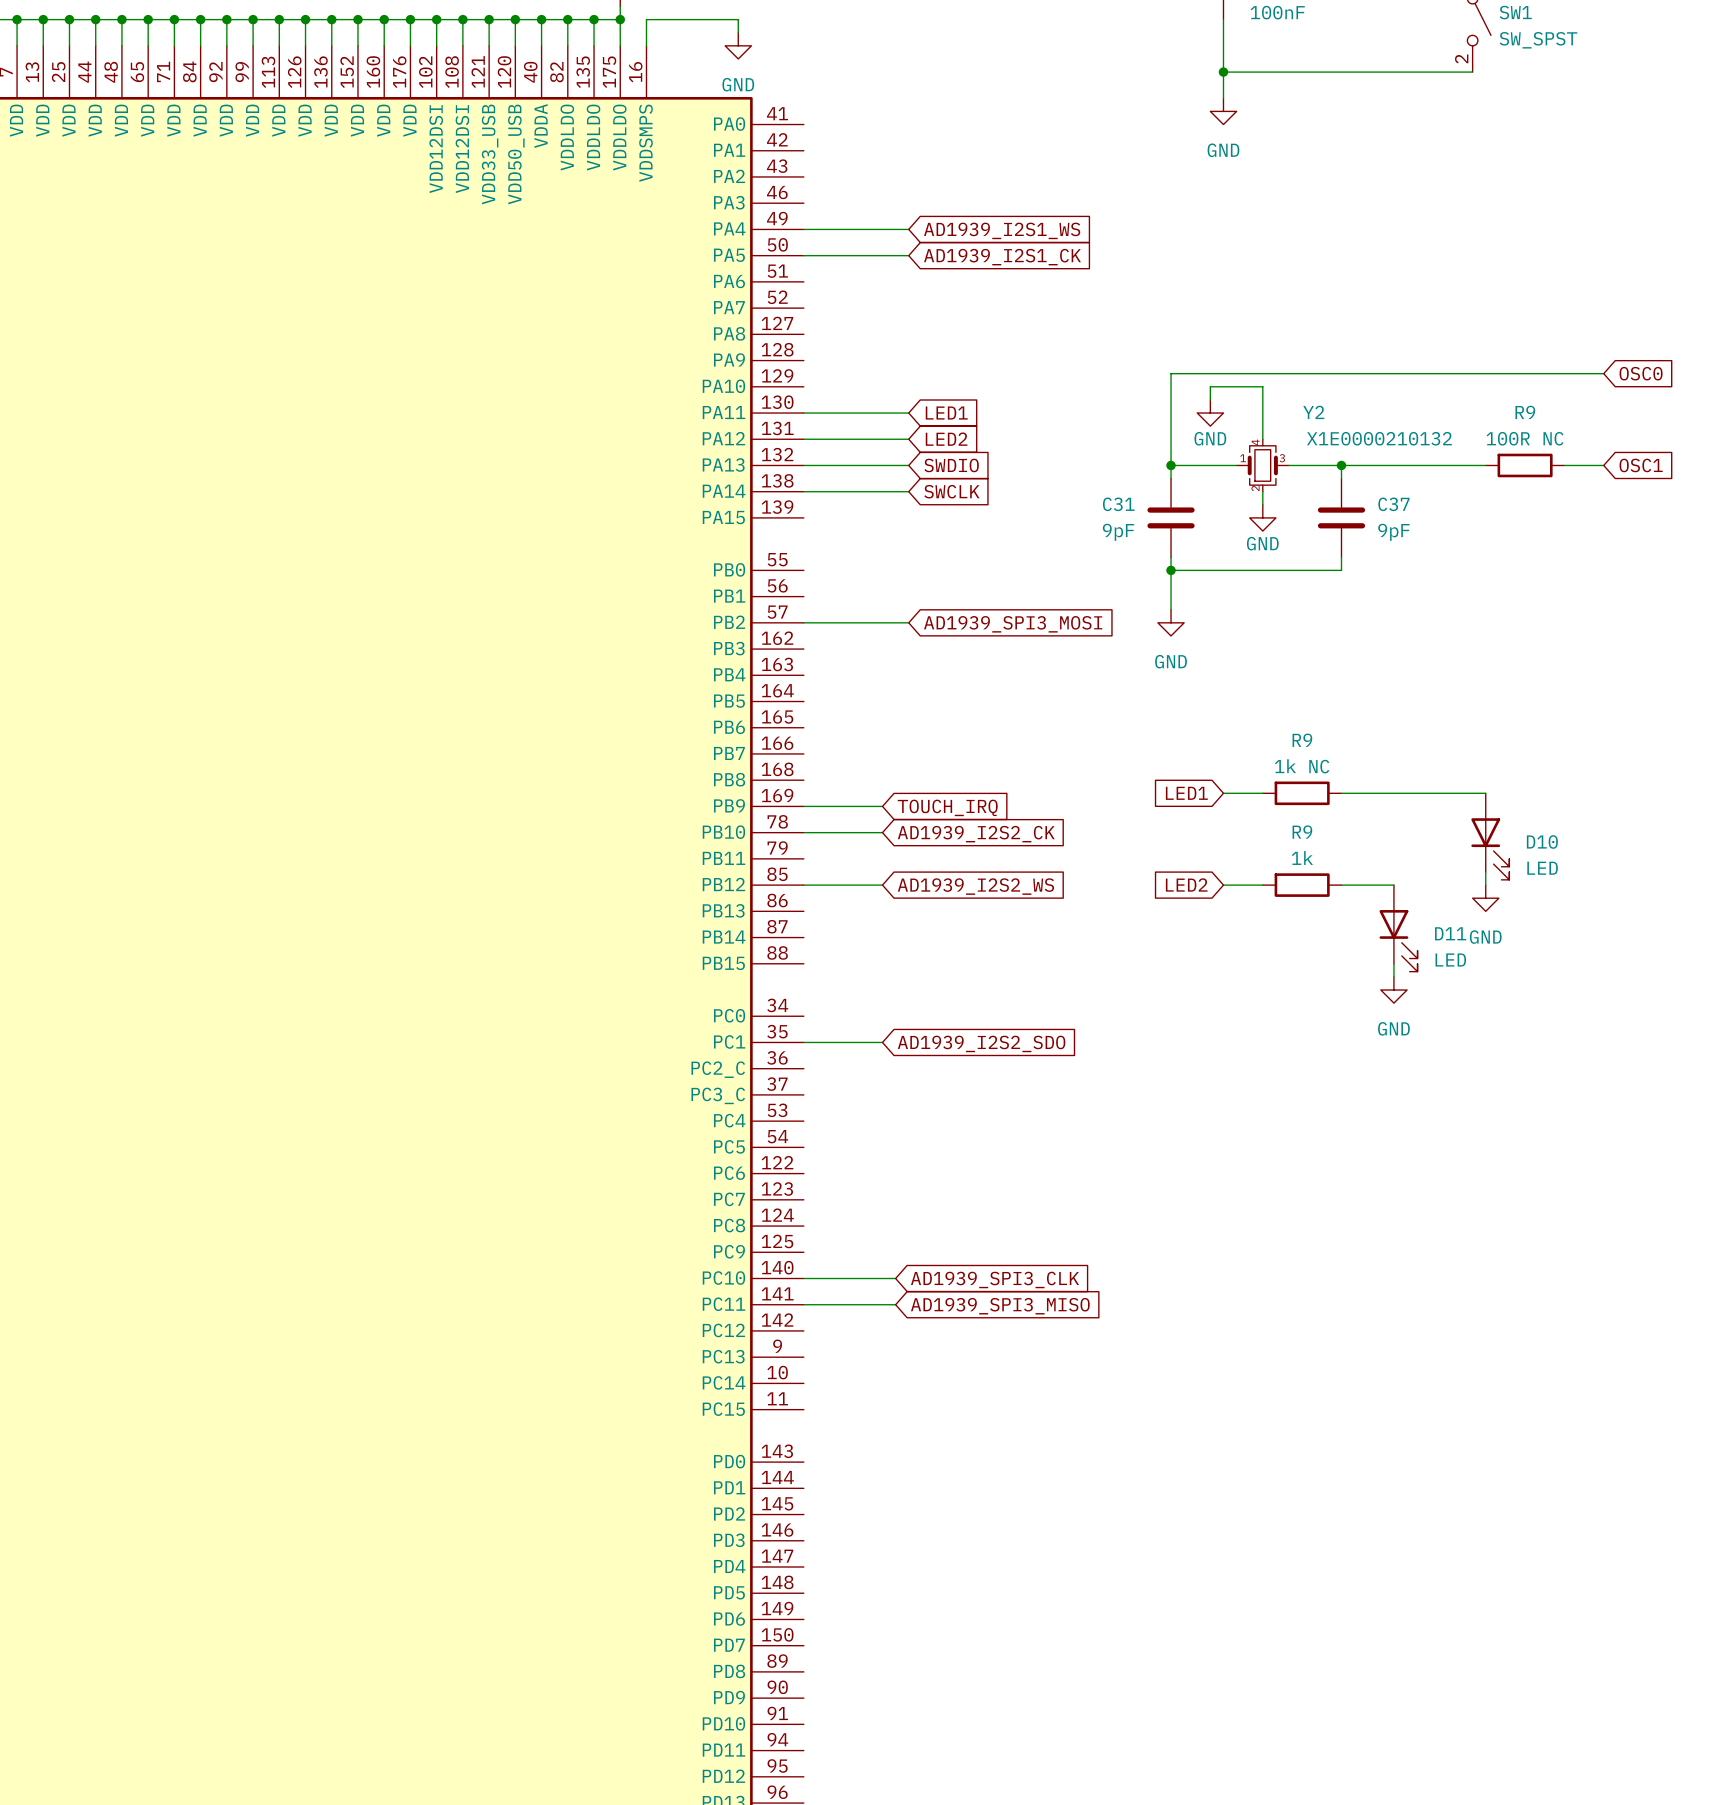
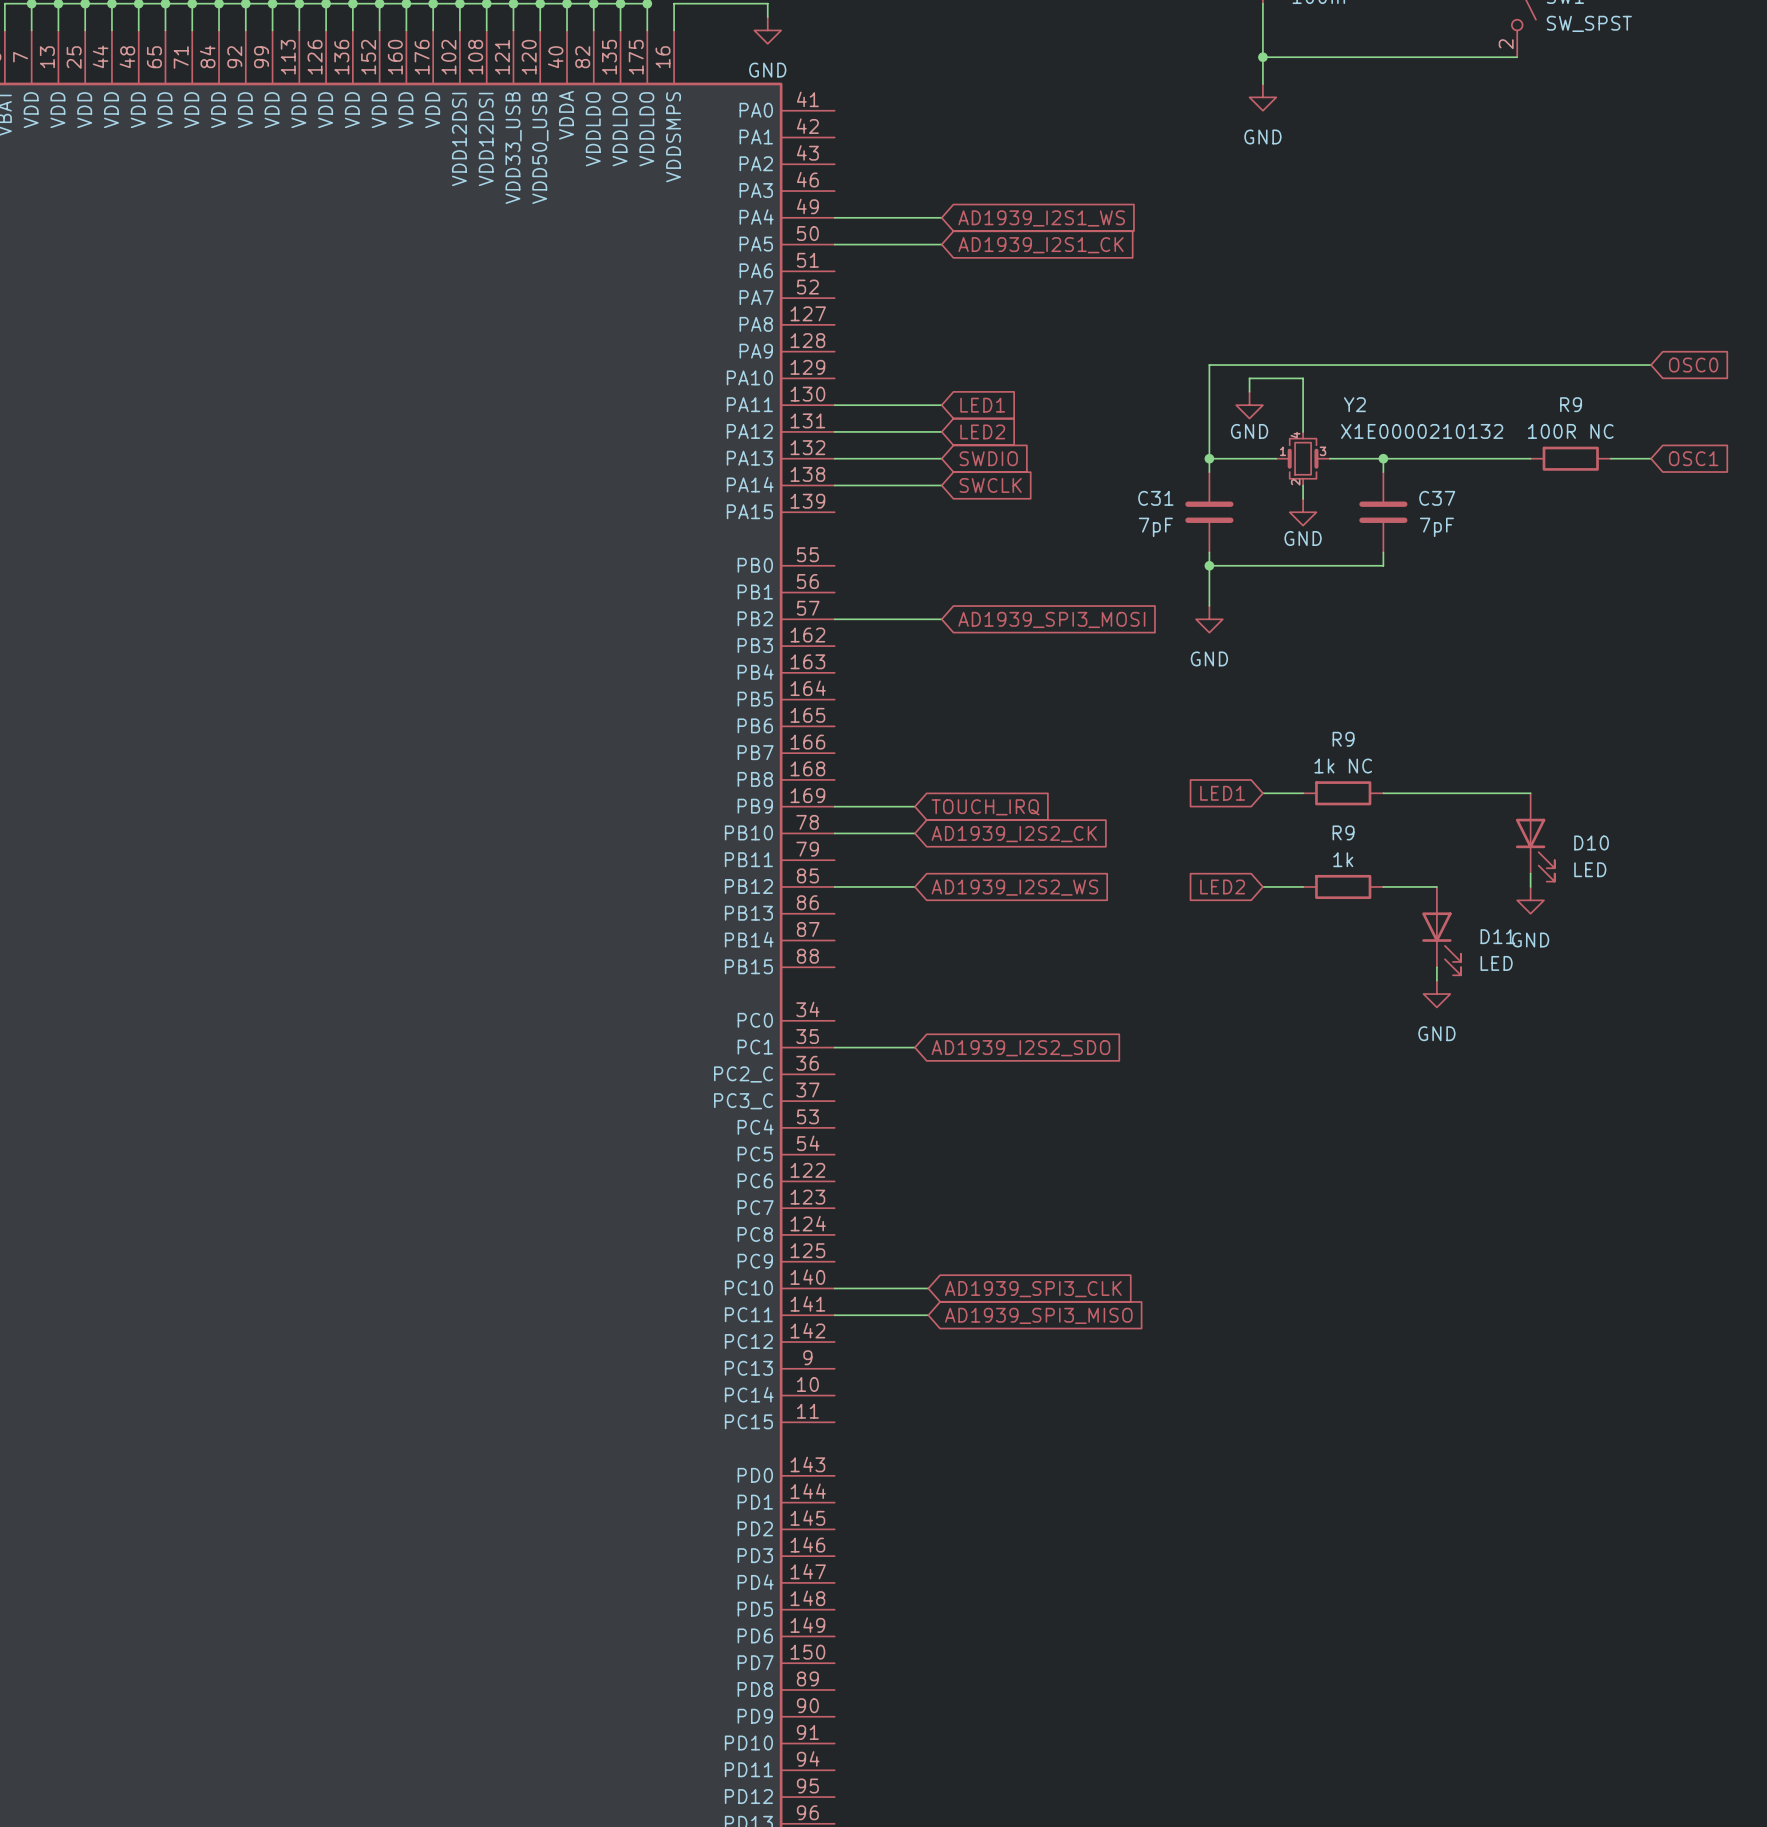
C31 value: 9pF (1118, 532) -> 7pF (1155, 527)
C37 value: 9pF (1393, 532) -> 7pF (1436, 527)

